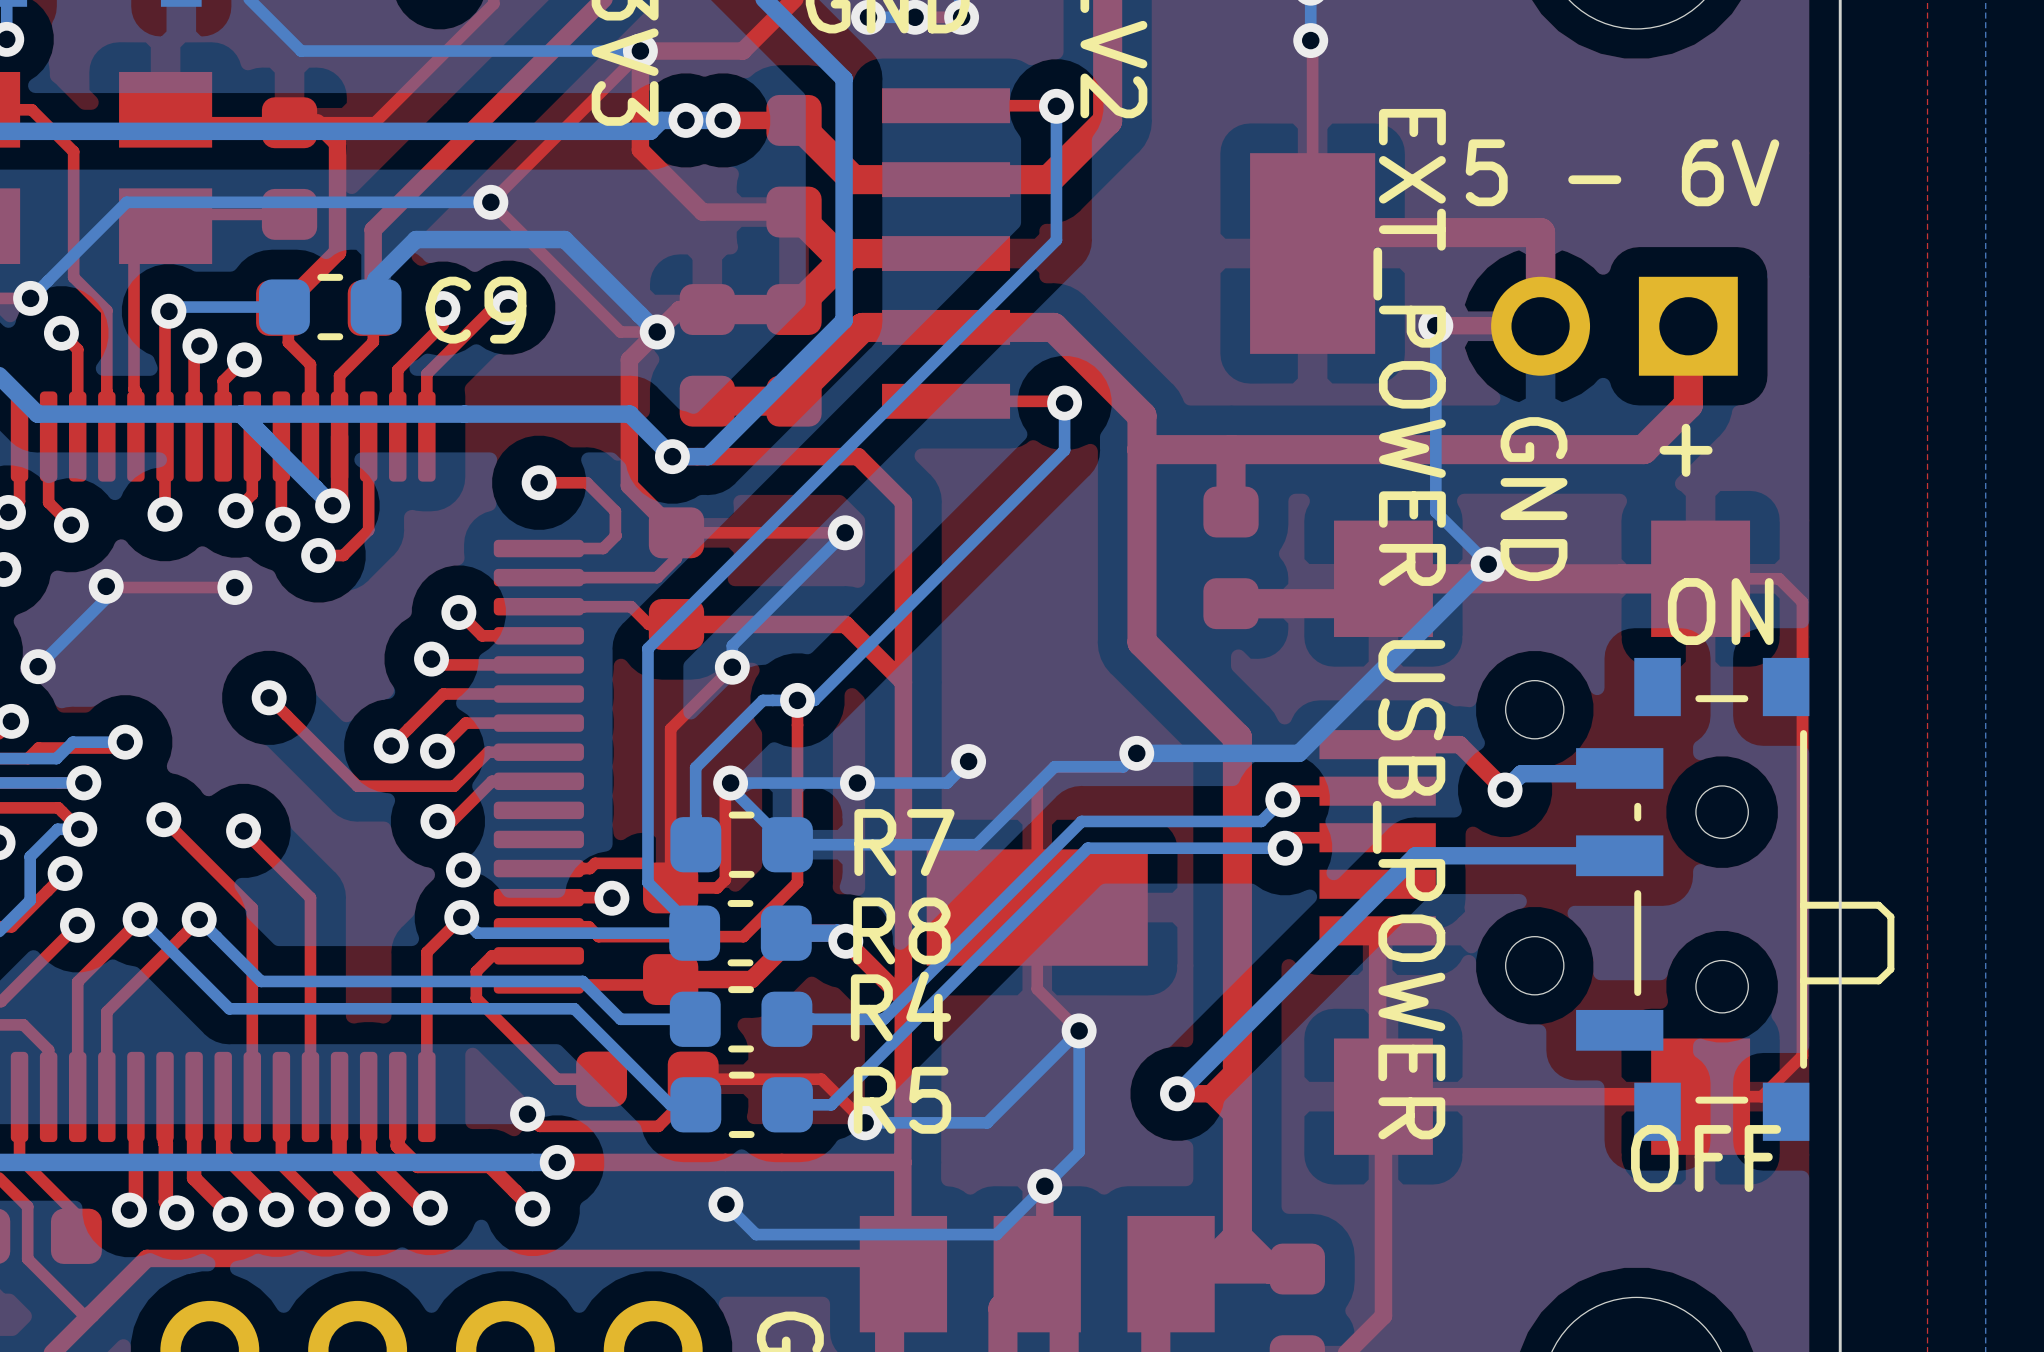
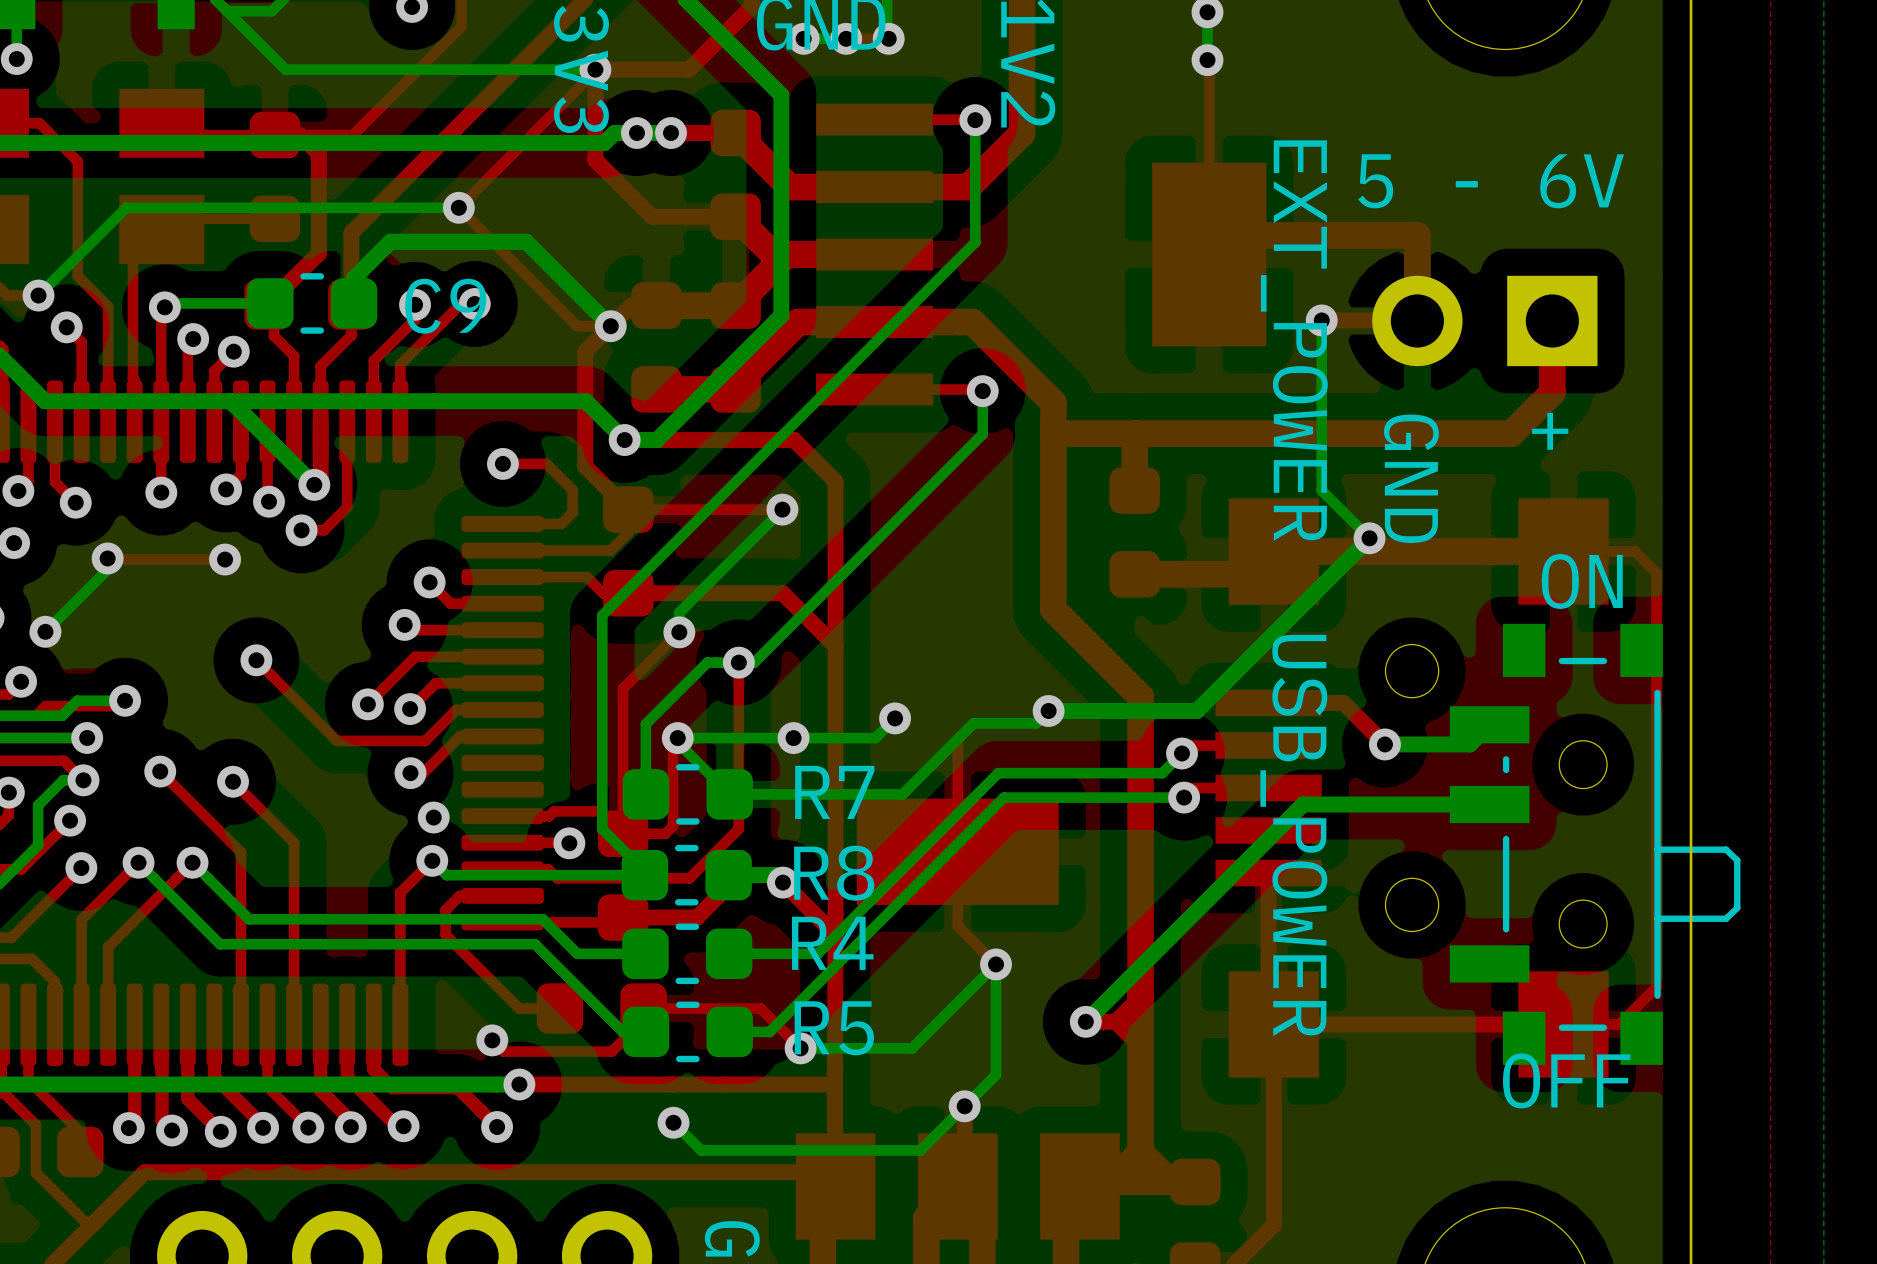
bottom track: (1614, 773) (1521, 773) (1505, 790) -> (1484, 729) (1469, 744) (1384, 744)

